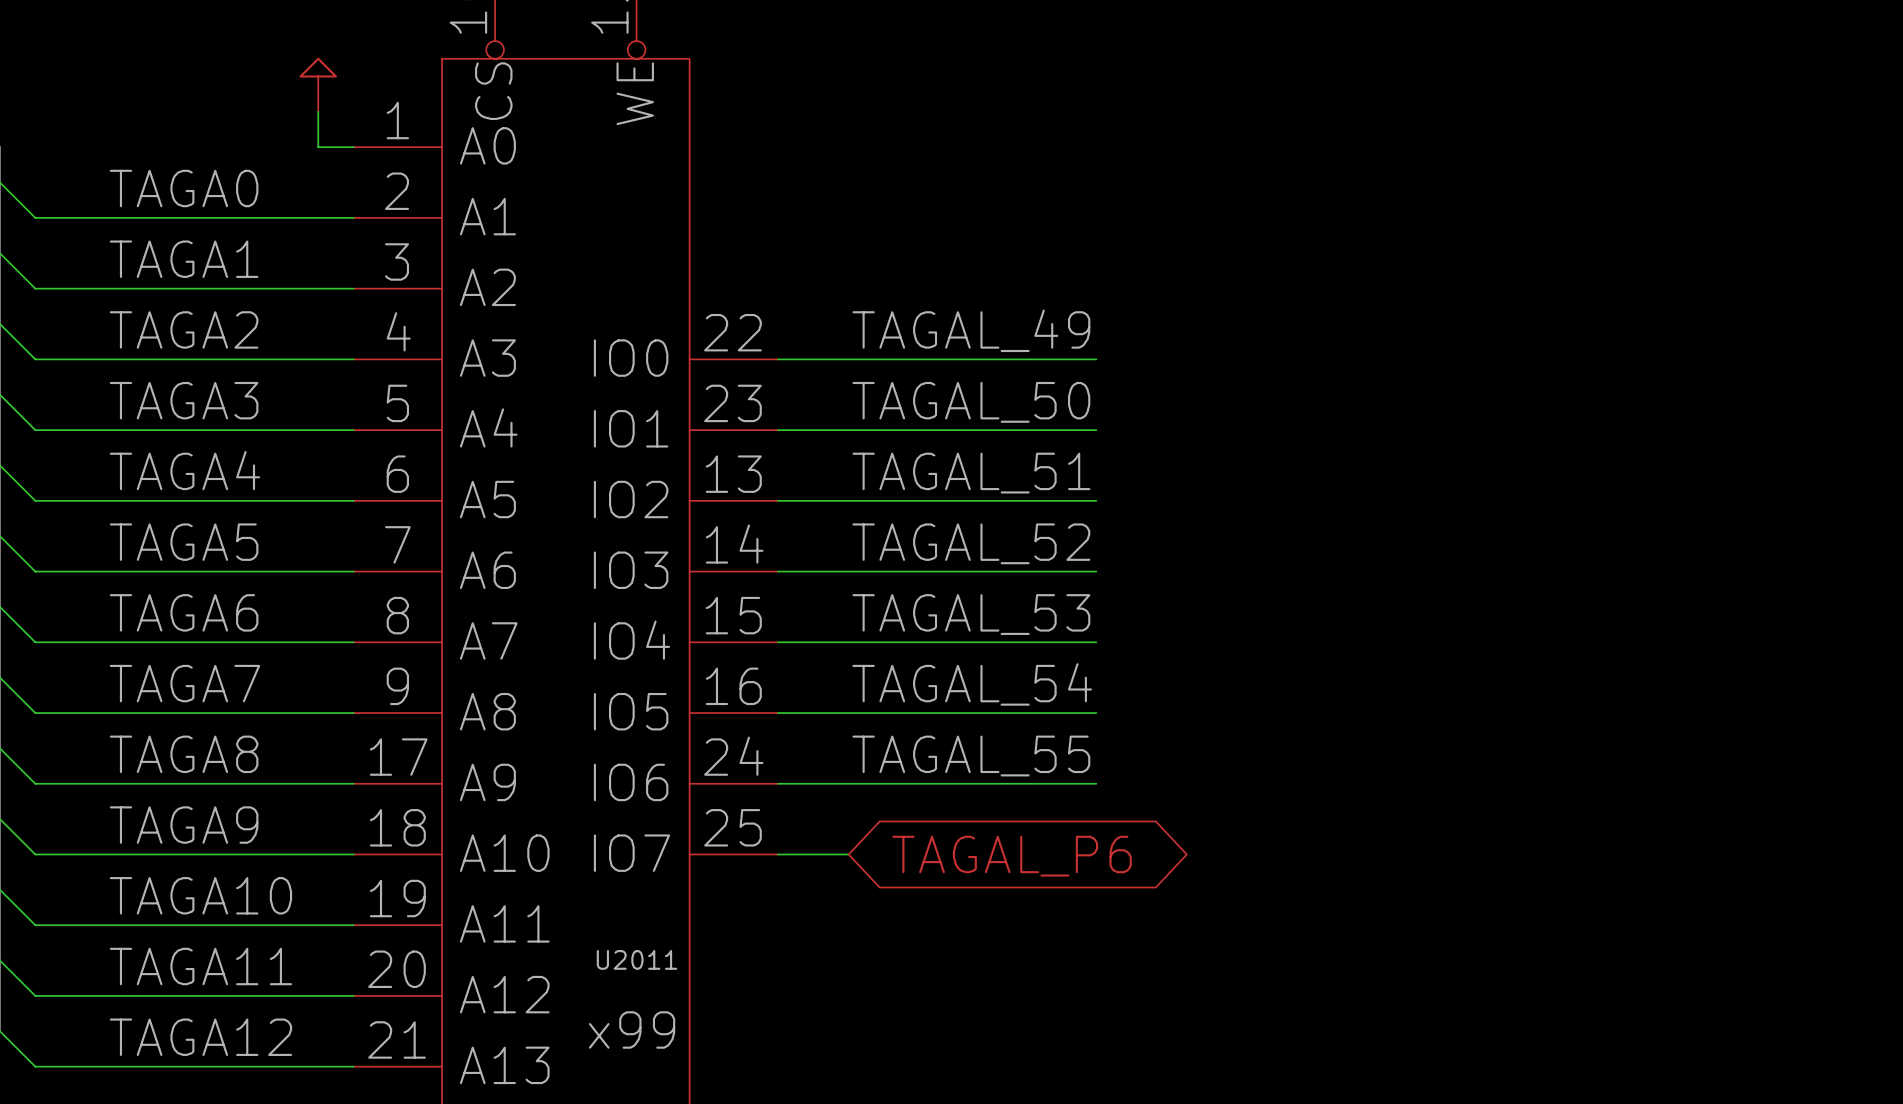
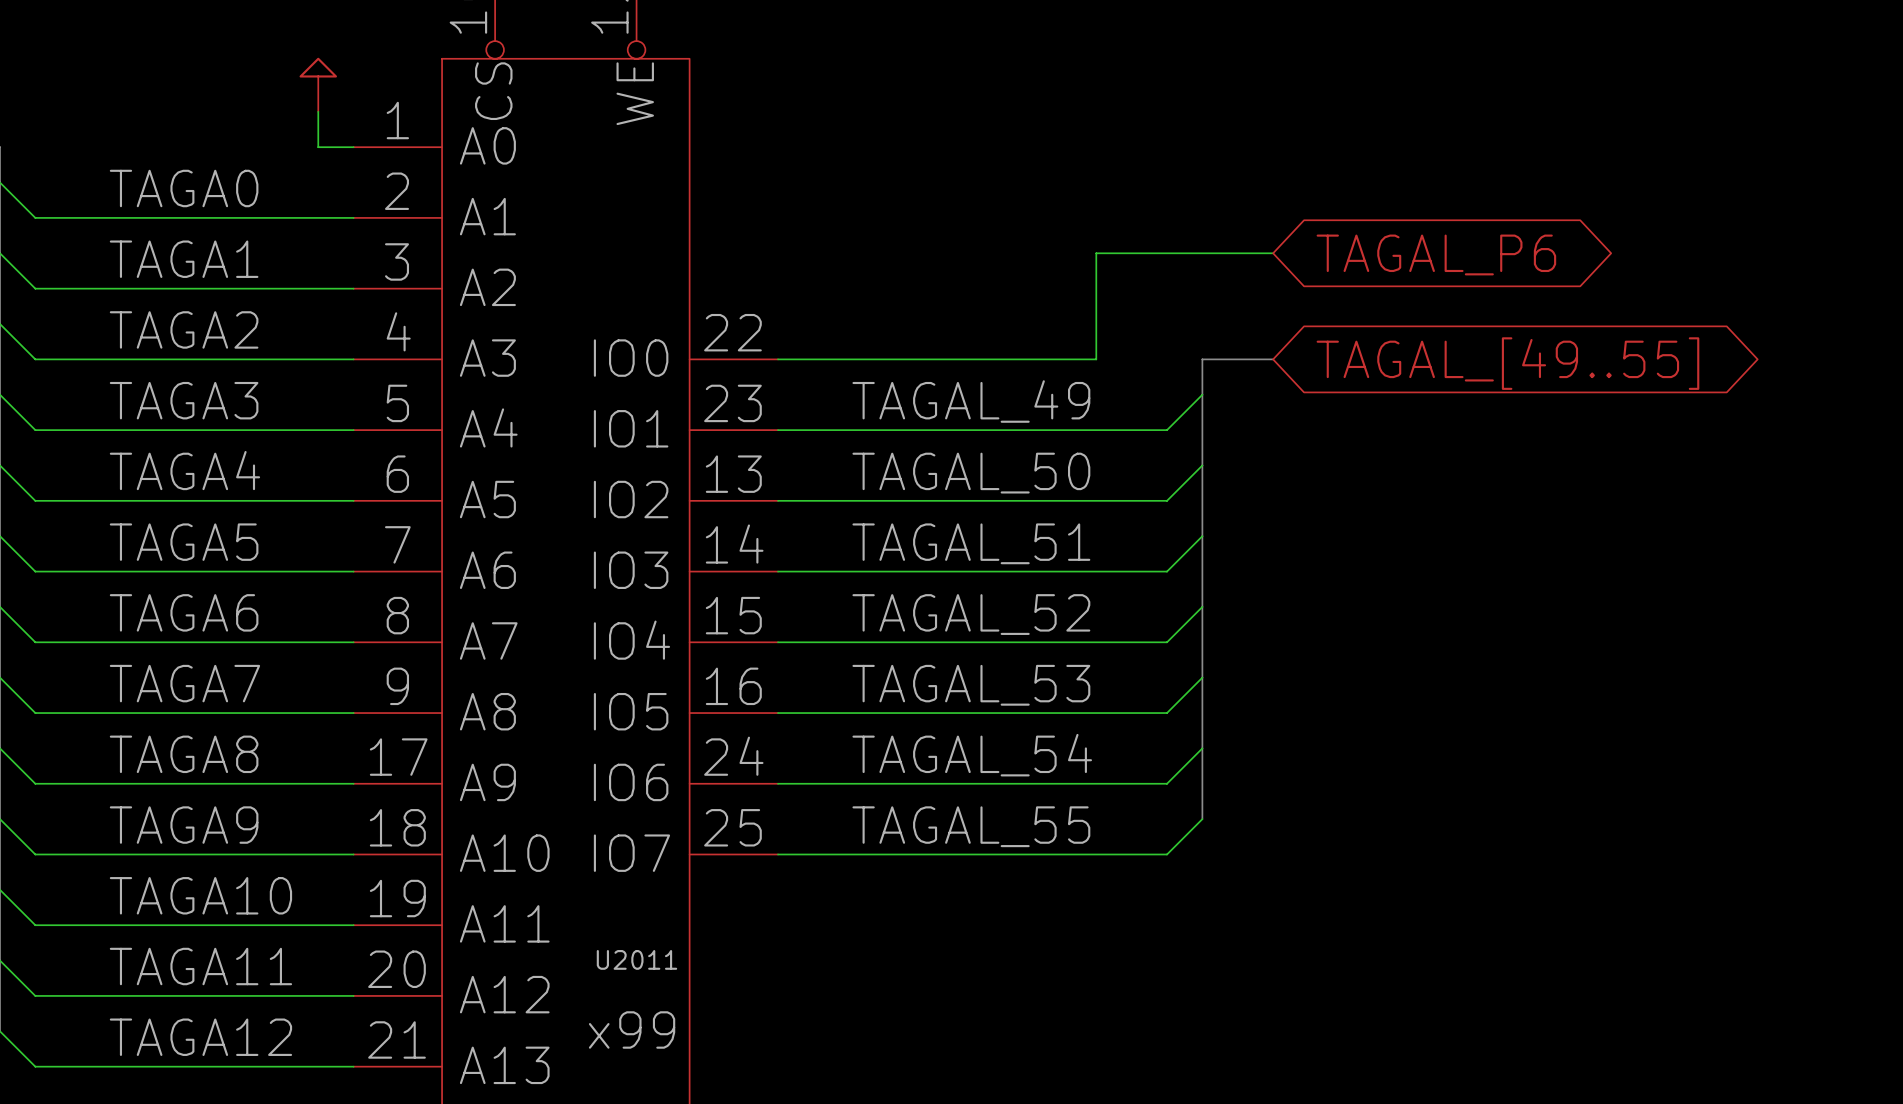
wire: none -> (1273, 253) (1096, 253) (1096, 359)
global label: none -> TAGAL_P6 (1436, 254)
label: TAGAL_49 (971, 330) -> none
bus: none -> (1273, 359) (1202, 359) (1202, 819)
global label: none -> TAGAL_[49..55] (1507, 363)
wire: none -> (1202, 394) (1167, 430) (1096, 430)
label: TAGAL_50 (971, 402) -> TAGAL_49 (971, 401)
wire: none -> (1202, 465) (1167, 500) (1096, 500)
label: TAGAL_51 (971, 473) -> TAGAL_50 (971, 473)
wire: none -> (1202, 536) (1167, 571) (1096, 571)
label: TAGAL_52 (971, 543) -> TAGAL_51 (971, 543)
wire: none -> (1202, 606) (1167, 642) (1096, 642)
label: TAGAL_53 (971, 614) -> TAGAL_52 (971, 614)
wire: none -> (1202, 677) (1167, 713) (1096, 713)
label: TAGAL_54 (972, 684) -> TAGAL_53 (971, 685)
wire: none -> (1202, 748) (1167, 783) (1096, 783)
label: TAGAL_55 (971, 756) -> TAGAL_54 (972, 755)
wire: none -> (1202, 819) (1167, 854) (848, 854)
label: none -> TAGAL_55 (971, 826)
global label: TAGAL_P6 (1012, 856) -> none

